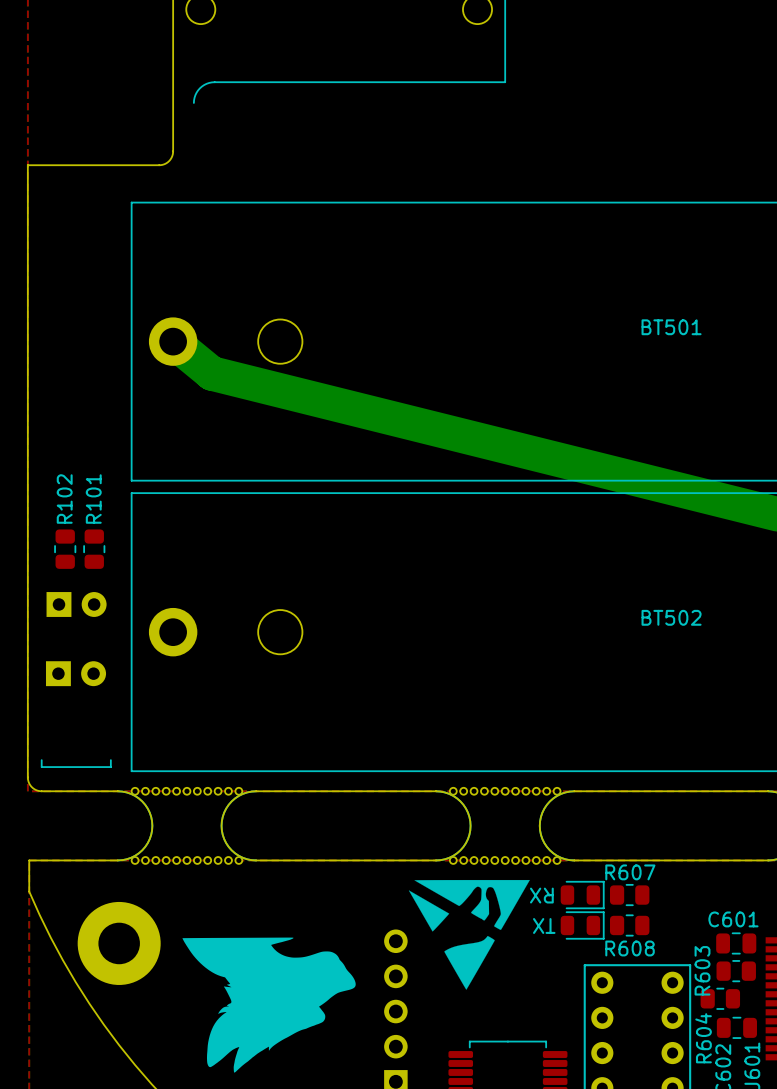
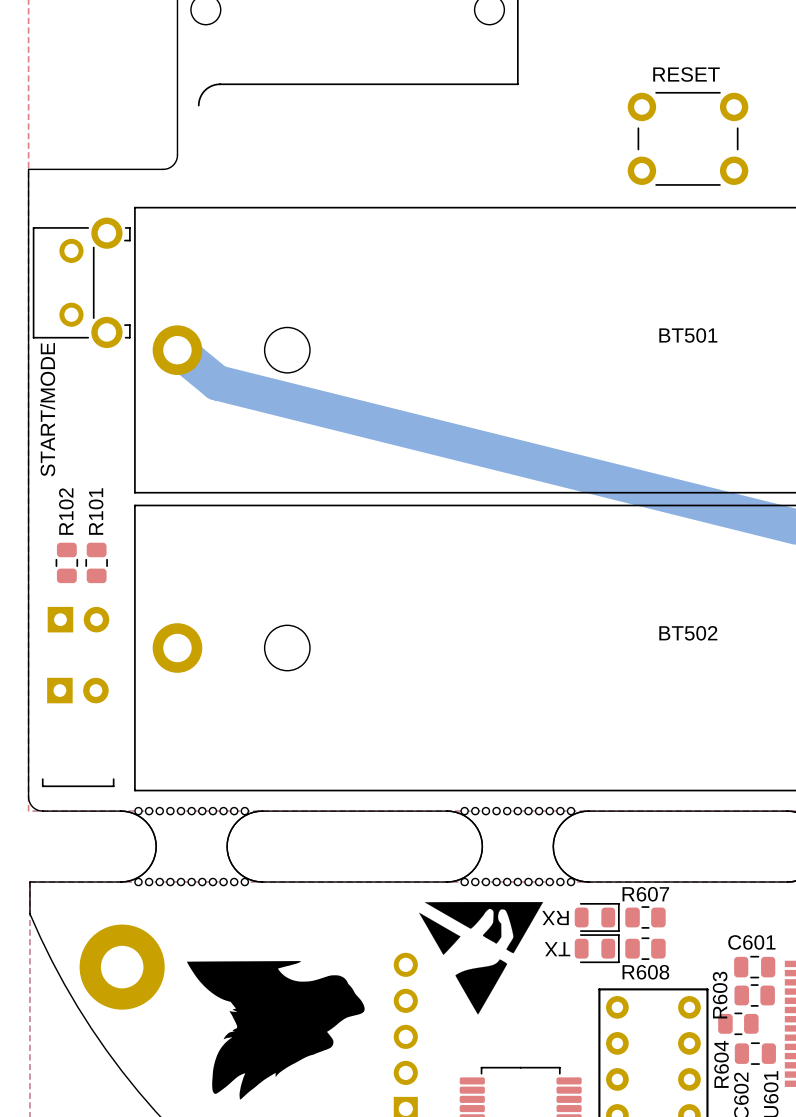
part: none -> RESET (688, 138)
part: none -> START/MODE (81, 282)

